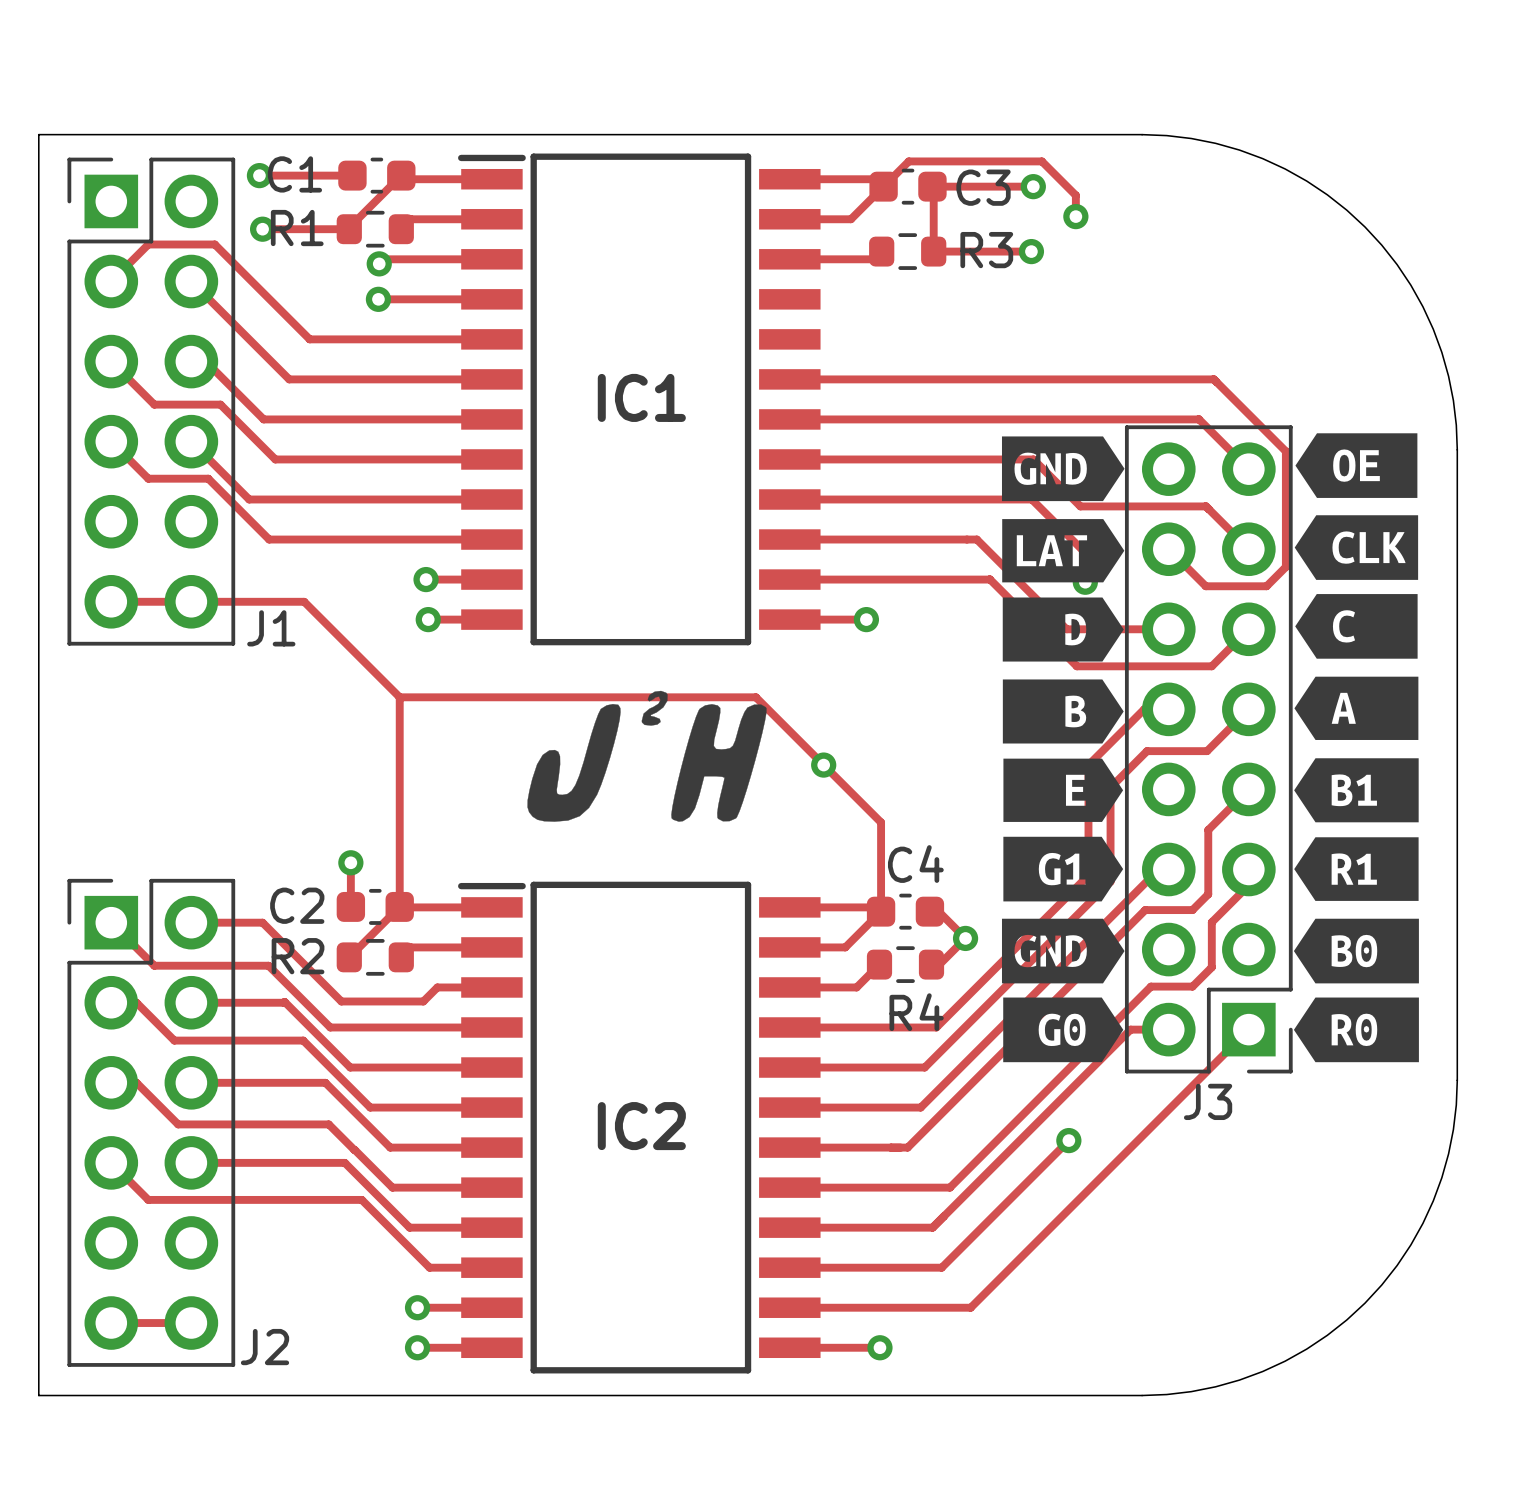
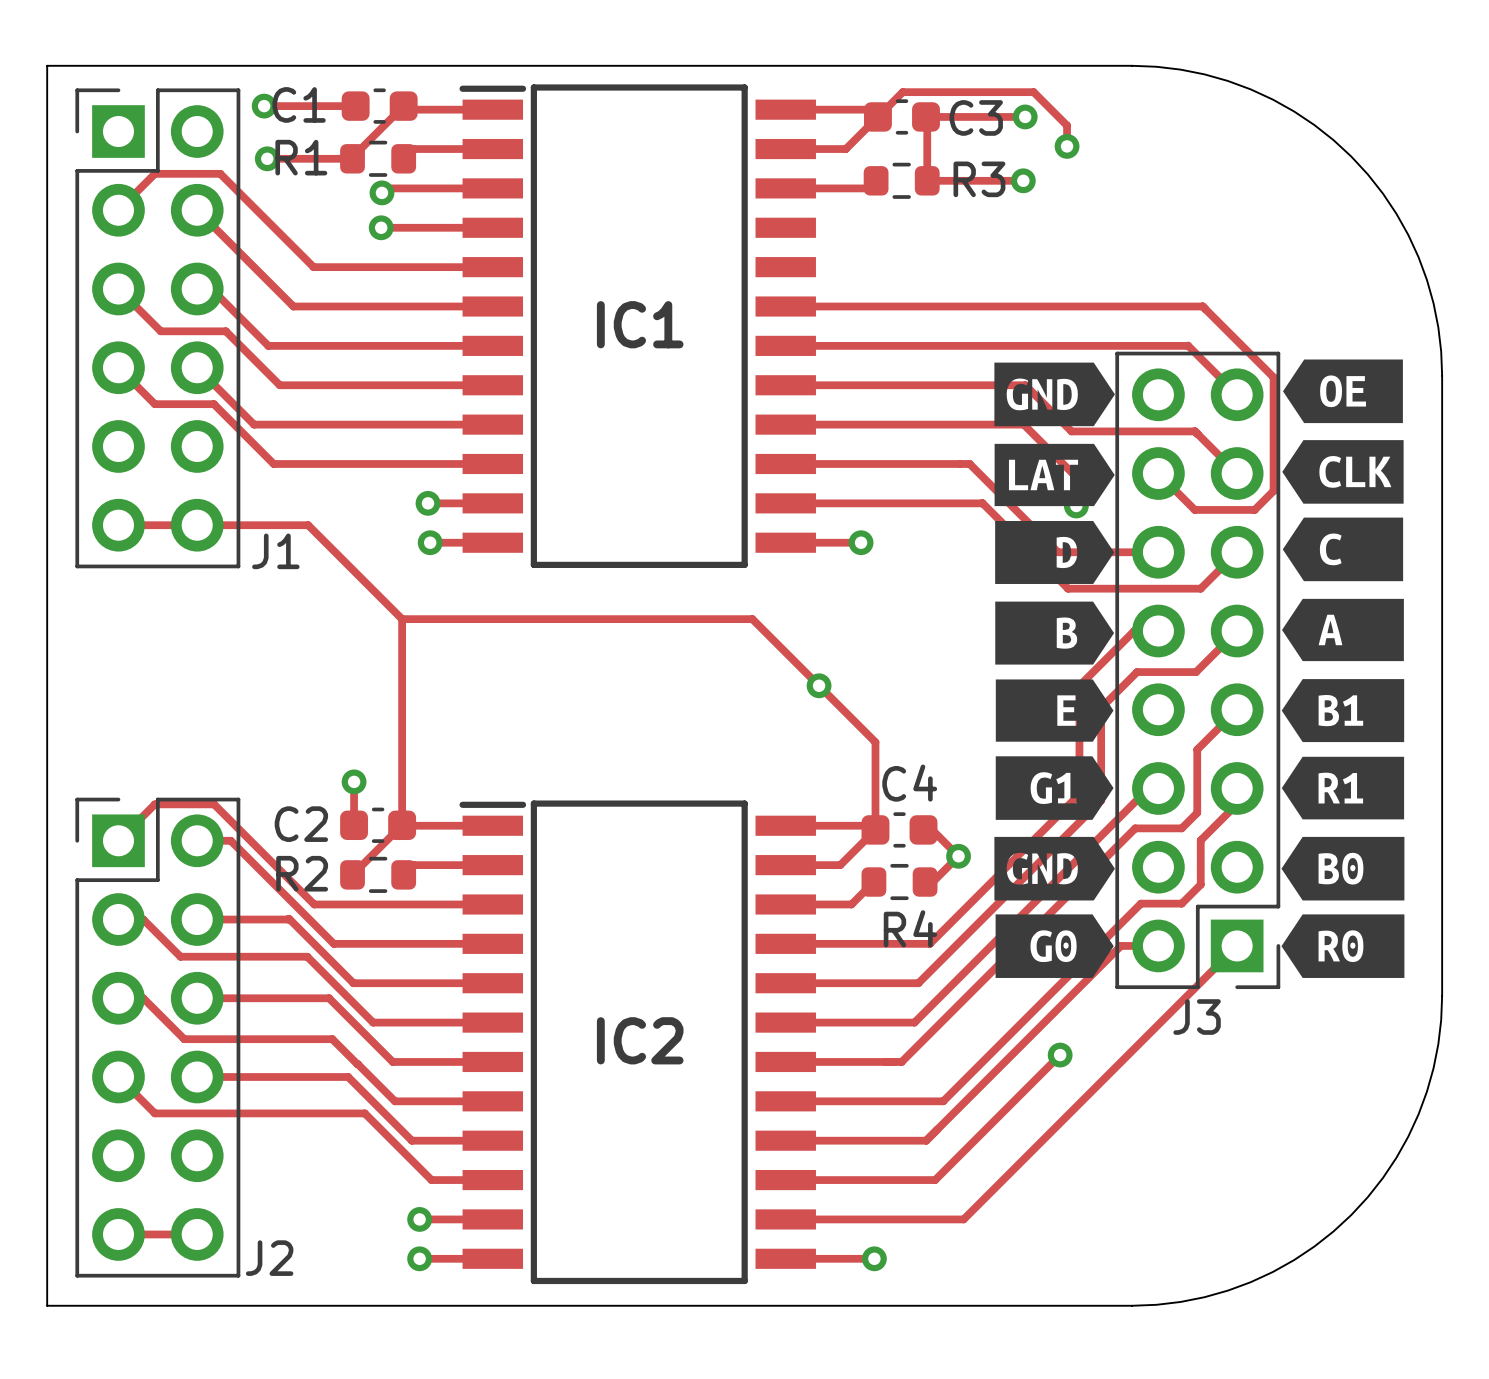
drawing: [527, 690, 767, 822] -> none
track: (111, 922) (154, 965) (268, 965) -> (230, 840) (273, 883)
track: (225, 922) (262, 922) (341, 1001) (423, 1001) (437, 987) -> (118, 840) (154, 804) (214, 804) (314, 904) (439, 904)

